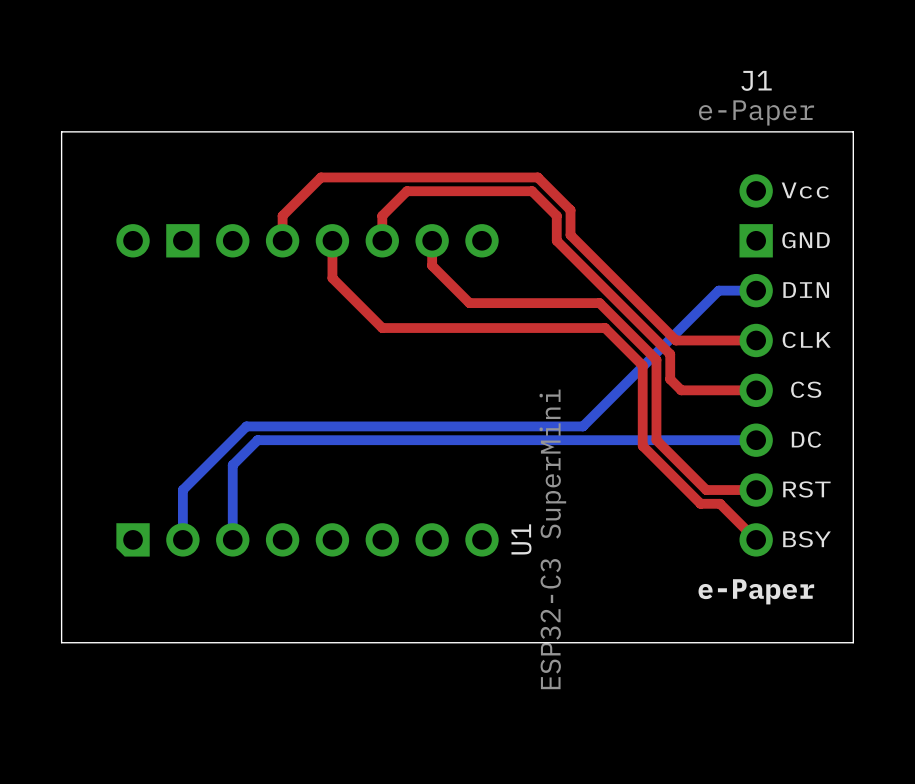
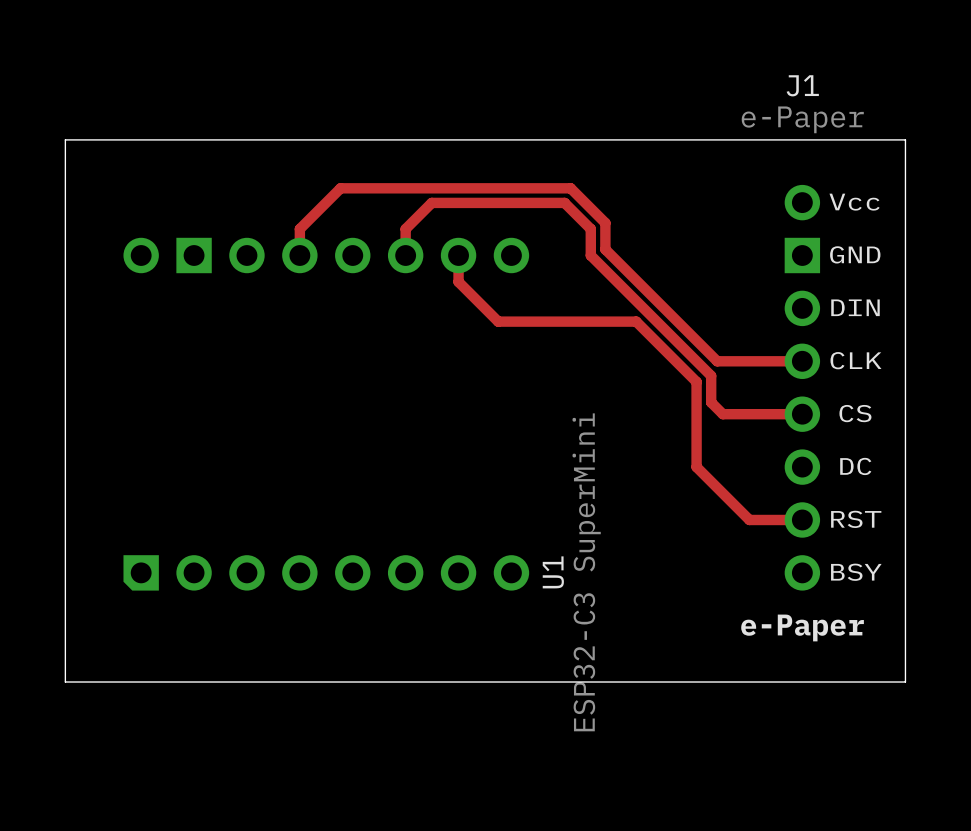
top track: (332, 240) (332, 278) (382, 328) (605, 328) (642, 365) (642, 445) (700, 503) (720, 503) (756, 539) -> none
bottom track: (756, 290) (718, 290) (582, 426) (246, 426) (182, 490) (182, 539) -> none
bottom track: (756, 440) (257, 440) (232, 465) (232, 539) -> none

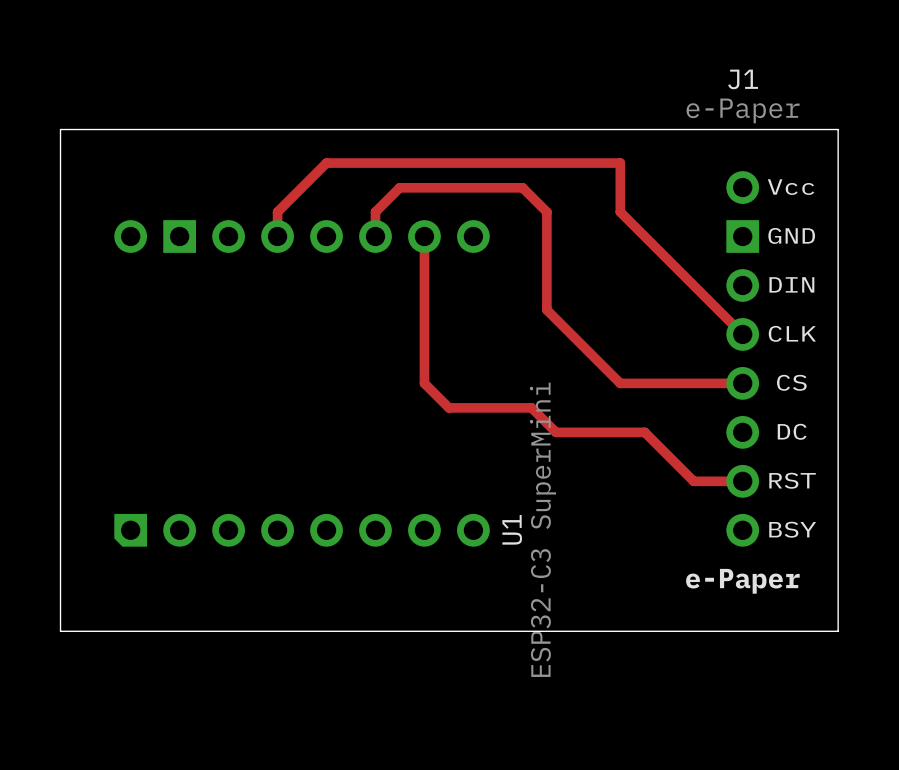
top track: (340, 188) (570, 188) (605, 223) (605, 249) (717, 361) (802, 361) -> (315, 174) (326, 163) (620, 163) (620, 212) (742, 334)
top track: (590, 255) (711, 375) (711, 402) (722, 414) -> (546, 236) (546, 309) (620, 383) (669, 383)
top track: (458, 281) (498, 321) (636, 321) (696, 381) (696, 467) -> (424, 260) (424, 383) (448, 407) (531, 407) (556, 432) (644, 432)

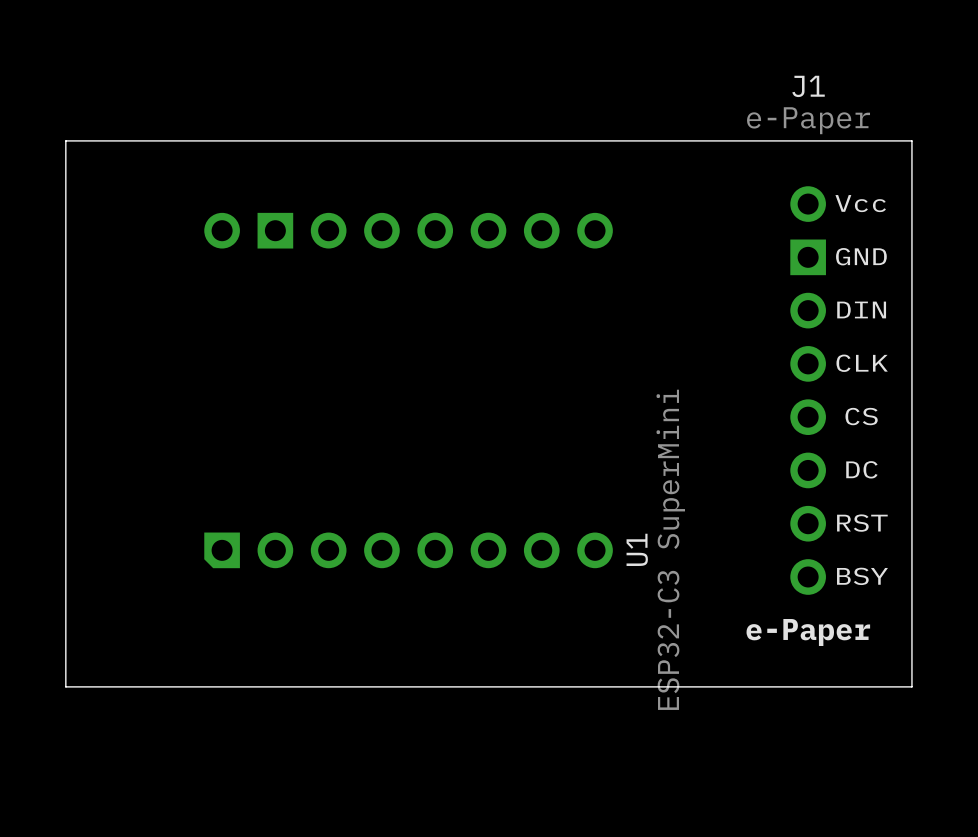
top track: (277, 236) (277, 212) (326, 163) (620, 163) (620, 212) (742, 334) -> none
top track: (375, 236) (375, 212) (399, 187) (522, 187) (546, 212) (546, 309) (620, 383) (742, 383) -> none
top track: (424, 236) (424, 383) (448, 407) (531, 407) (556, 432) (644, 432) (693, 481) (742, 481) -> none
U1 position: (302, 383) -> (408, 390)

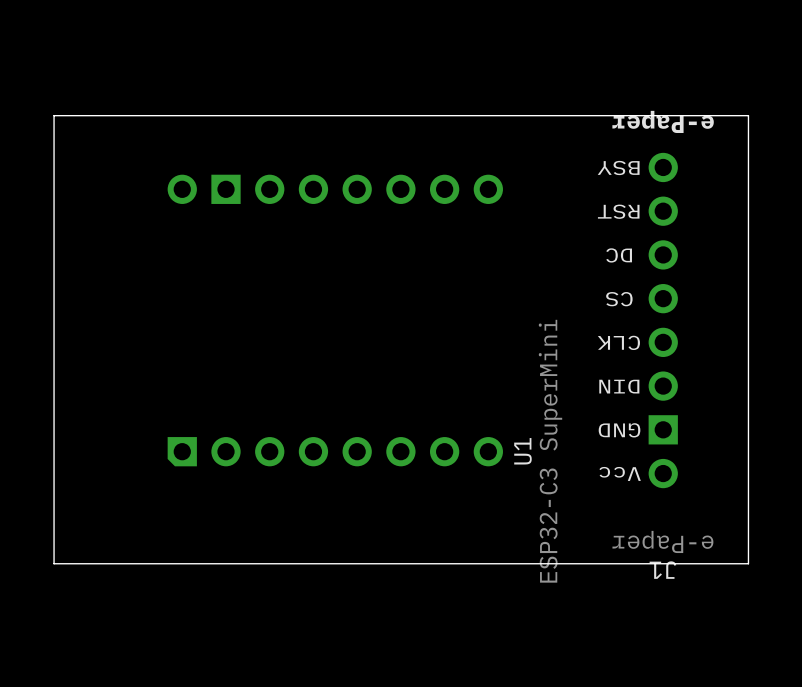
J1 rotation: 0° (808, 390) -> 180° (663, 320)

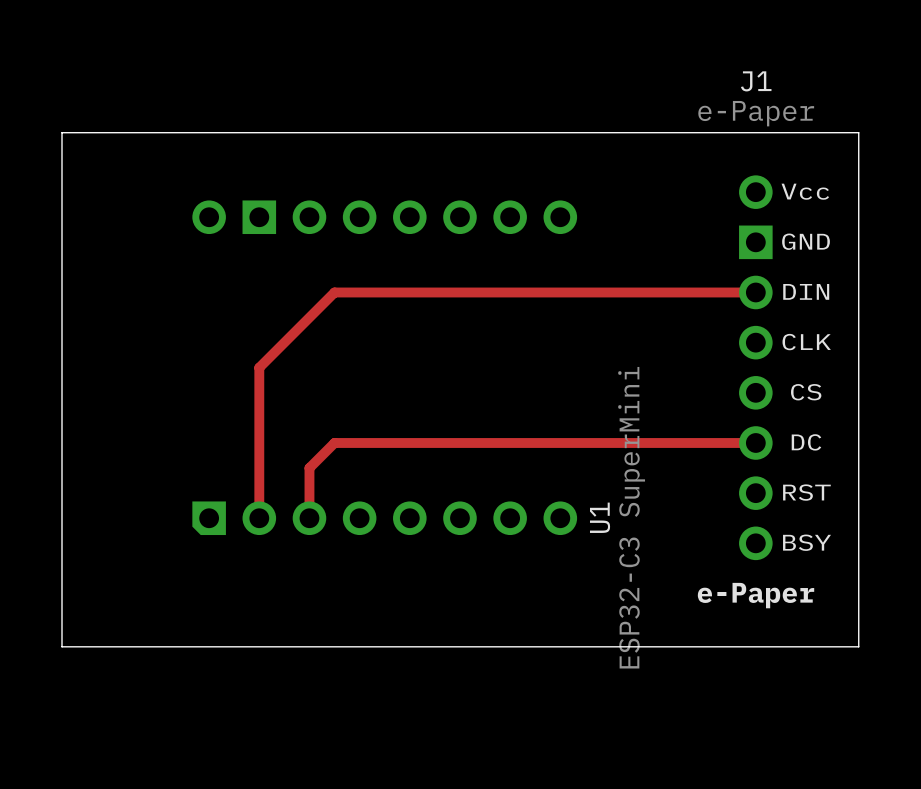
top track: none -> (755, 292) (334, 292) (259, 367) (259, 518)
J1 rotation: 0° (663, 320) -> 180° (755, 367)
top track: none -> (755, 442) (334, 442) (309, 468) (309, 518)

